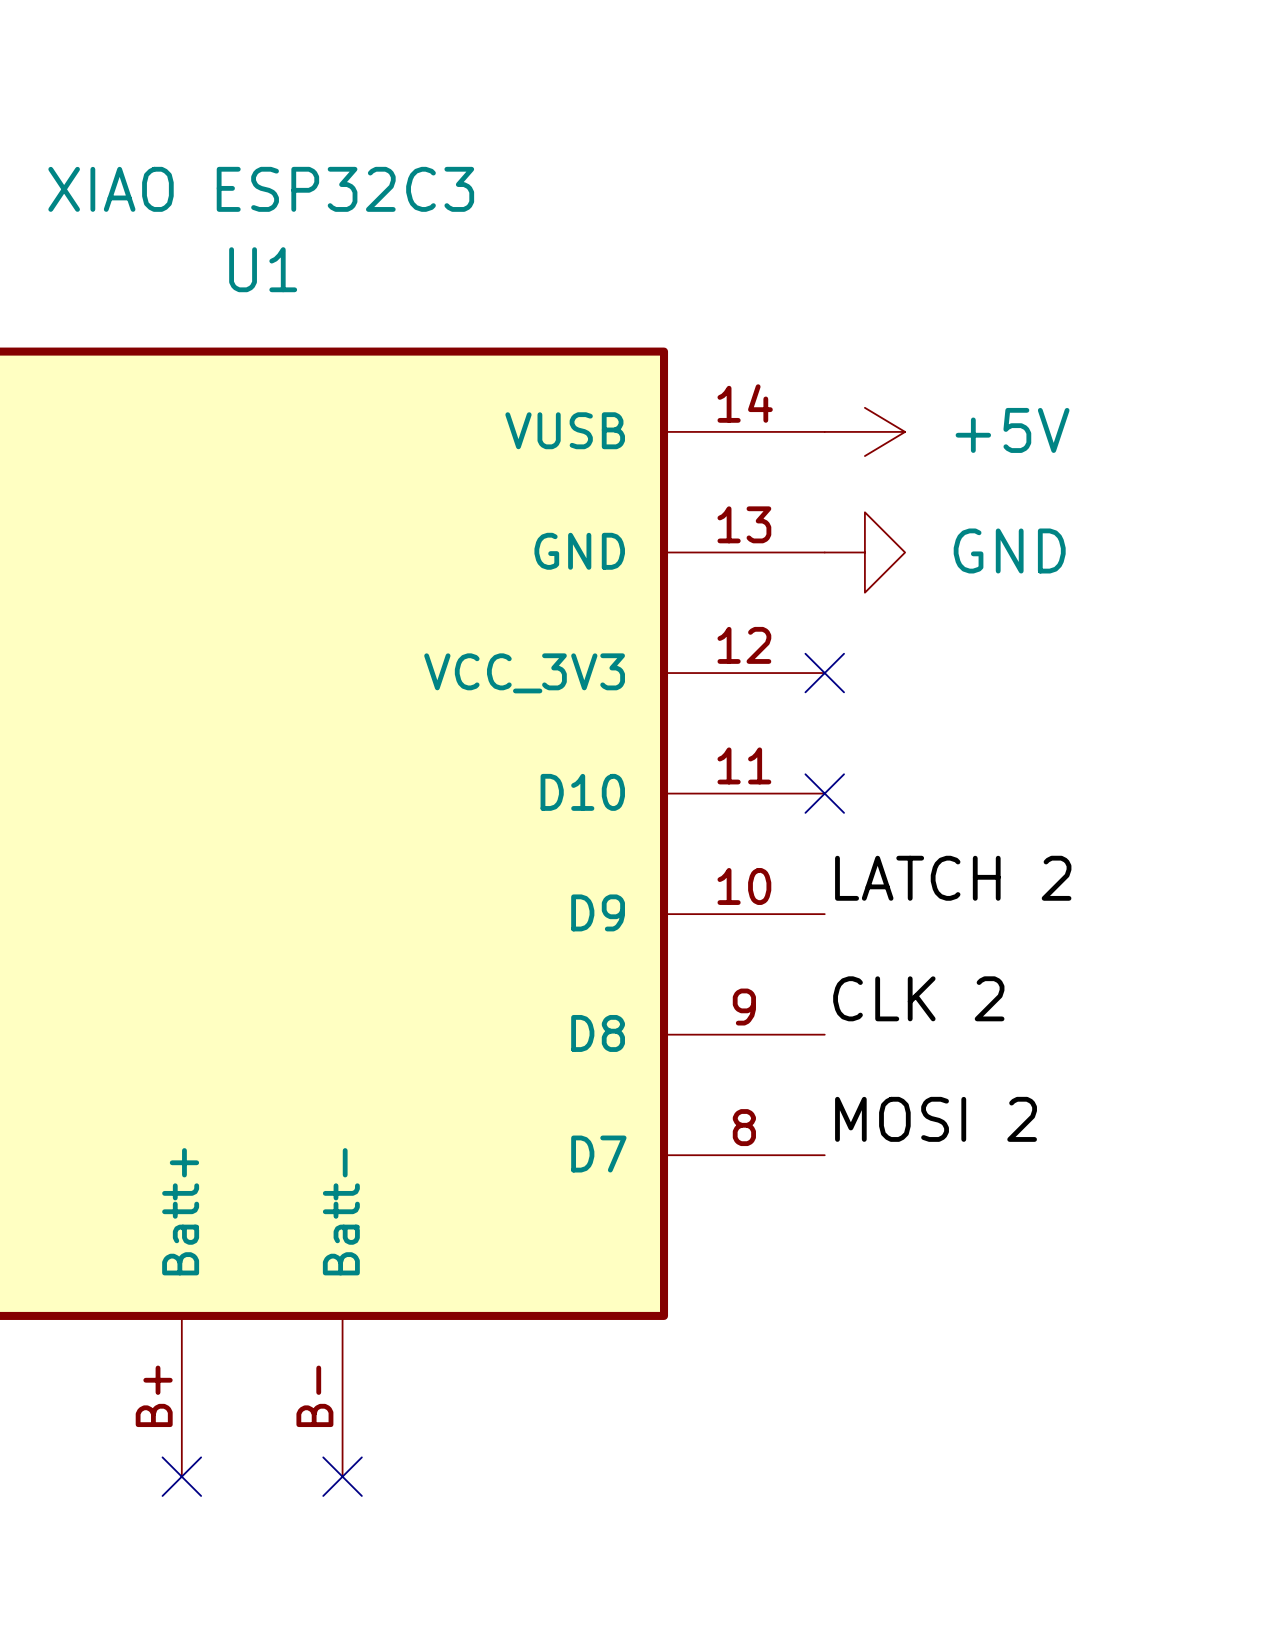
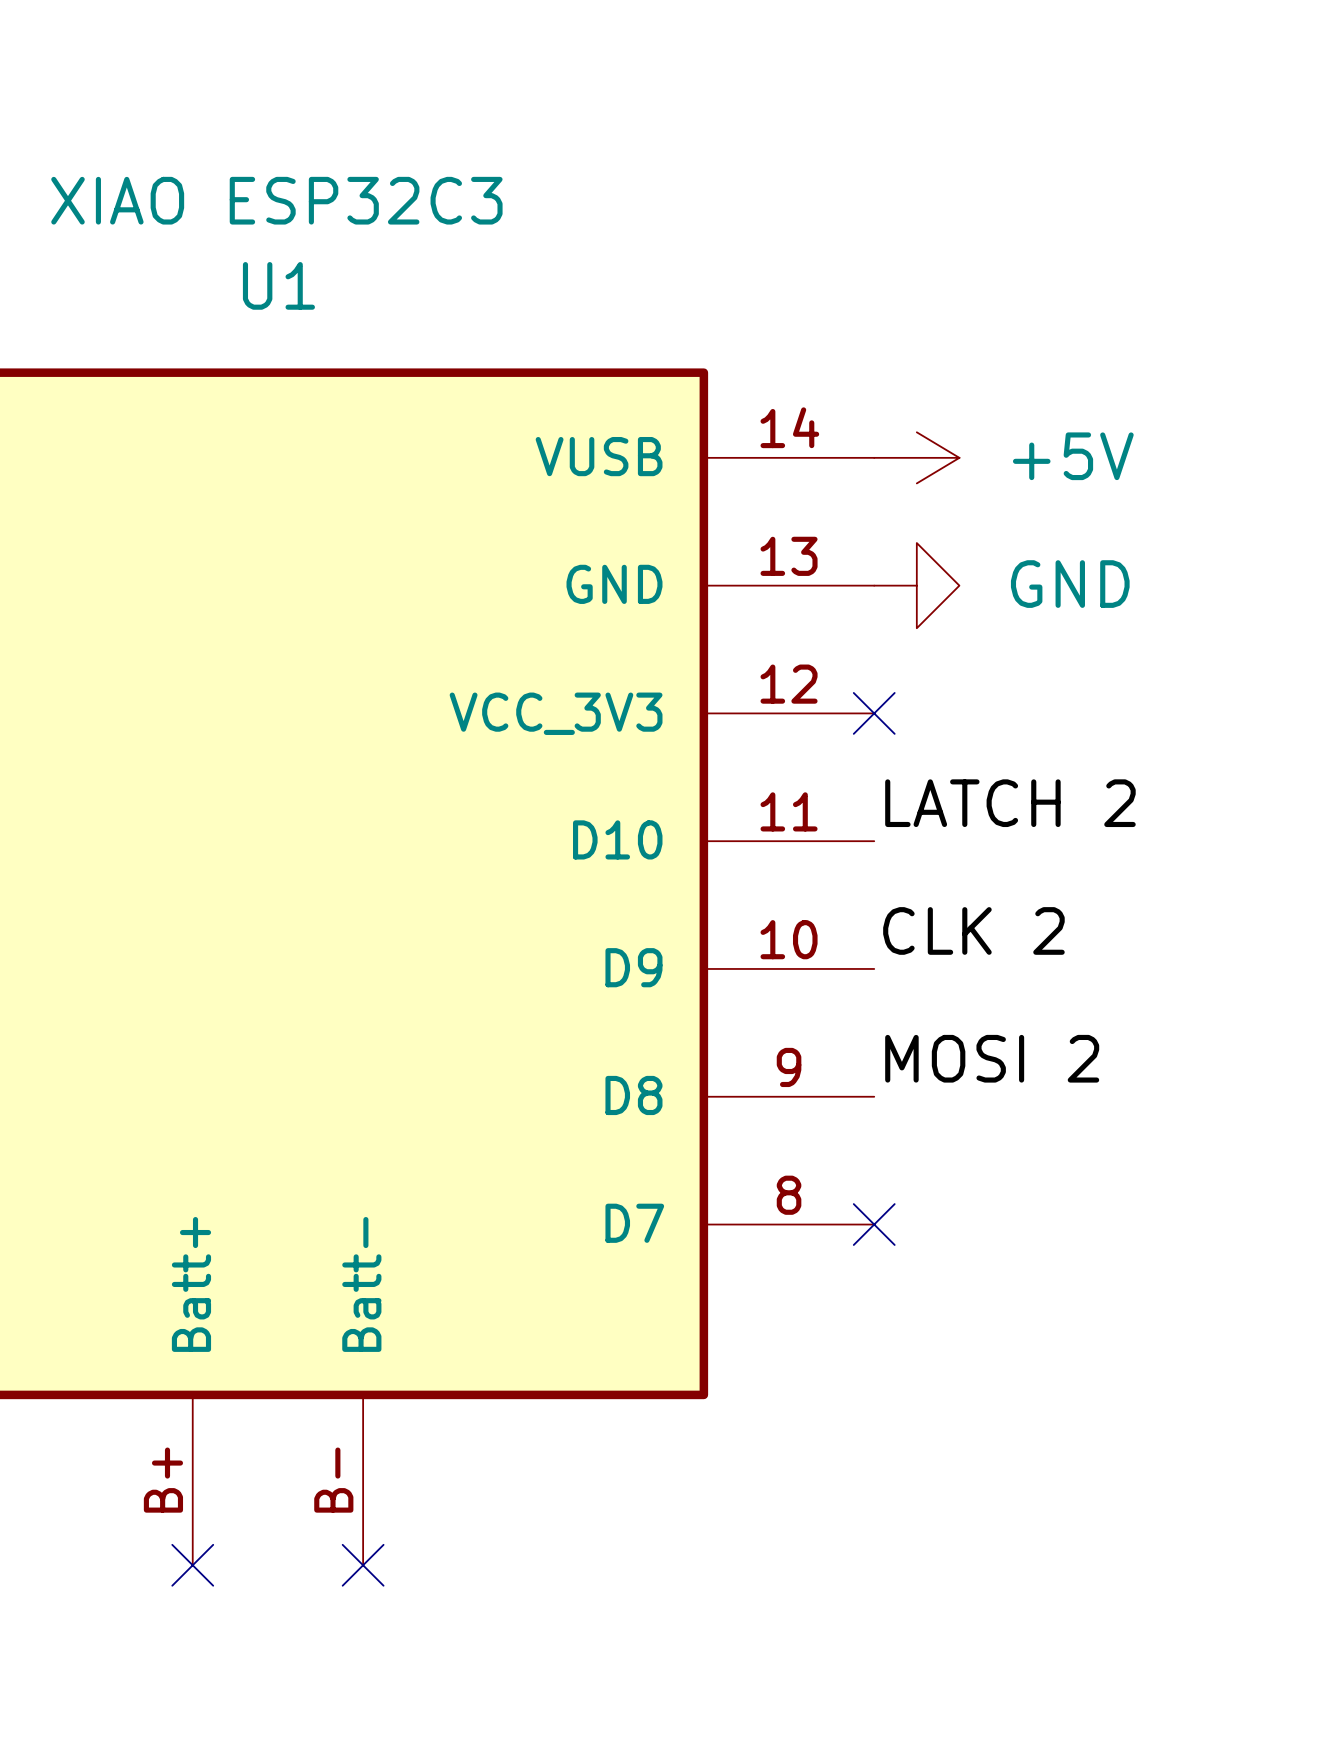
label: none -> LATCH 2 (1010, 803)
no-connect mark: (824, 793) -> none
label: LATCH 2 (953, 878) -> CLK 2 (973, 930)
label: CLK 2 (918, 998) -> MOSI 2 (992, 1058)
label: MOSI 2 (936, 1119) -> none
no-connect mark: none -> (874, 1224)

